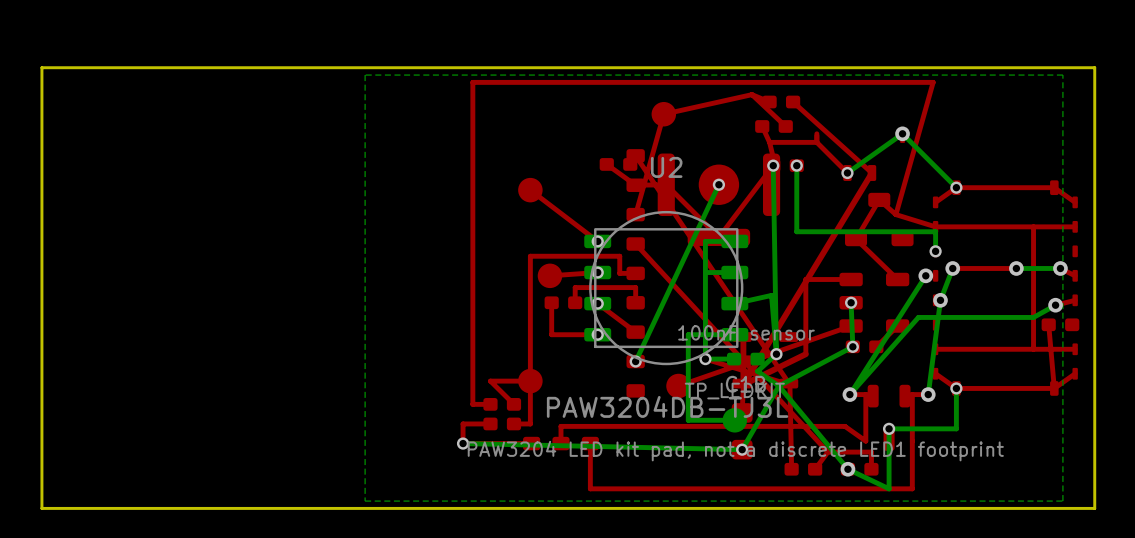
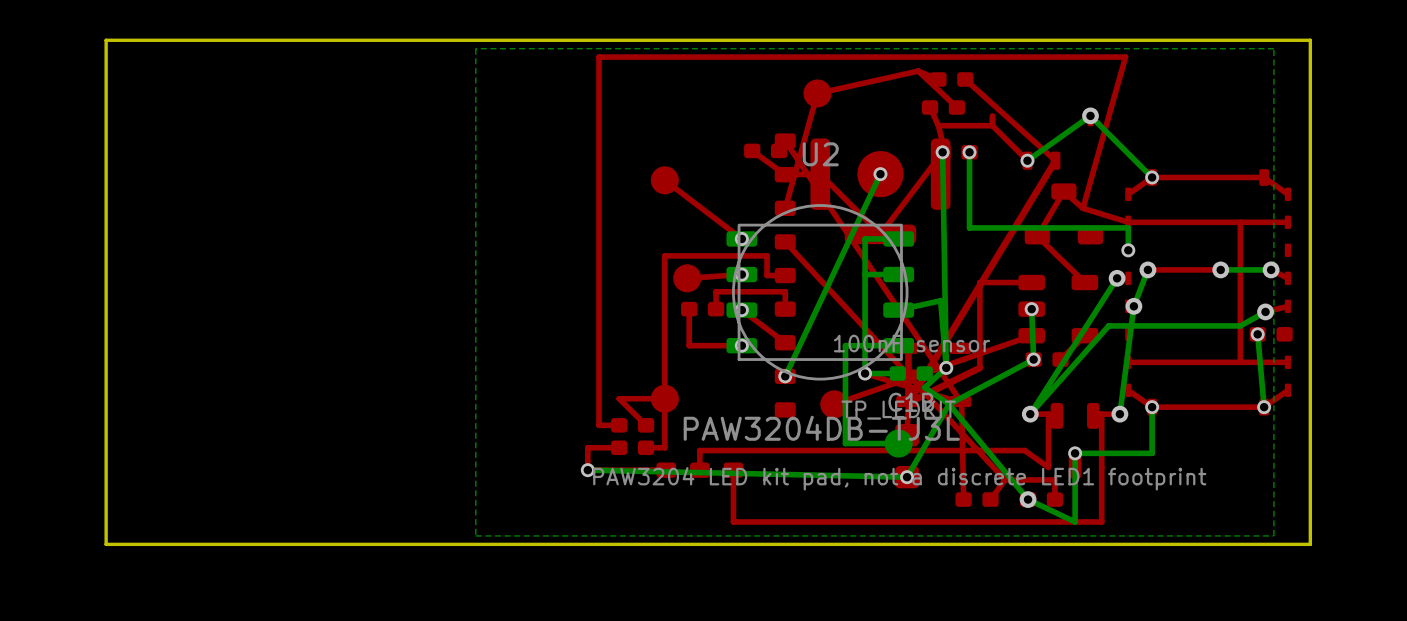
top track: (1048, 324) (1054, 388) -> none
bottom track: none -> (1257, 334) (1264, 407)
via: none -> (1257, 334)
via: none -> (1264, 407)

